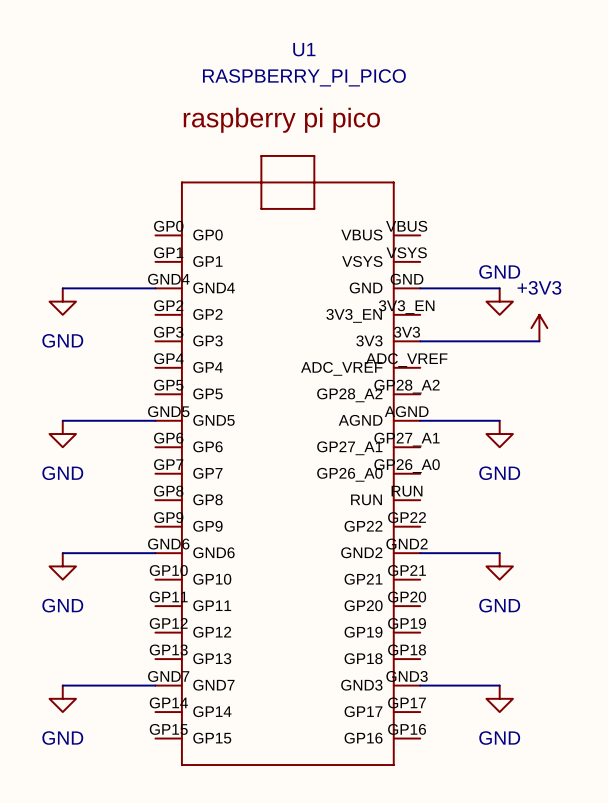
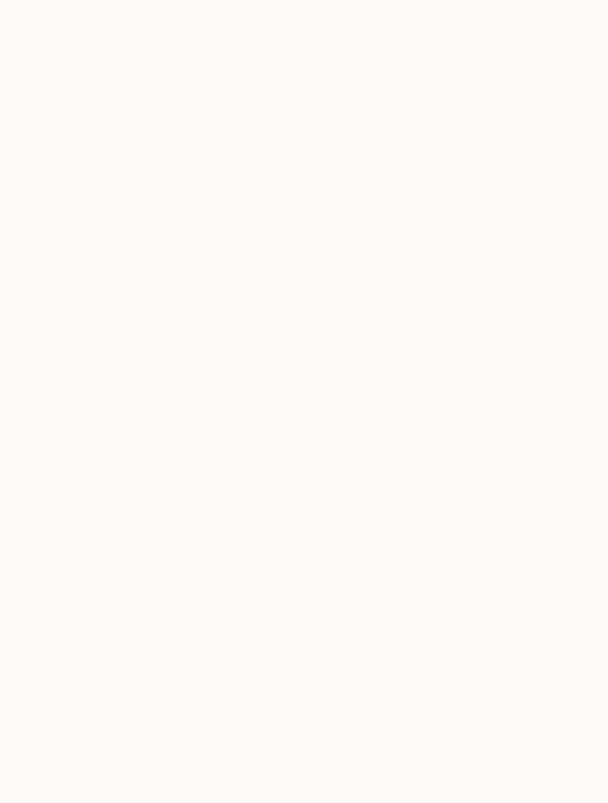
wire: (62, 288) (155, 288) -> none
wire: (420, 288) (499, 288) -> none
power symbol: GND (62, 301) -> none
power symbol: GND (499, 301) -> none
power symbol: +3V3 (539, 328) -> none
wire: (420, 341) (539, 341) -> none
wire: (62, 420) (155, 420) -> none
wire: (420, 420) (499, 420) -> none
power symbol: GND (62, 434) -> none
power symbol: GND (499, 434) -> none
U1: RASPBERRY_PI_PICO (287, 460) -> none
wire: (62, 553) (155, 553) -> none
wire: (420, 553) (499, 553) -> none
power symbol: GND (62, 566) -> none
power symbol: GND (499, 566) -> none
wire: (62, 685) (155, 685) -> none
wire: (420, 685) (499, 685) -> none
power symbol: GND (62, 698) -> none
power symbol: GND (499, 698) -> none

